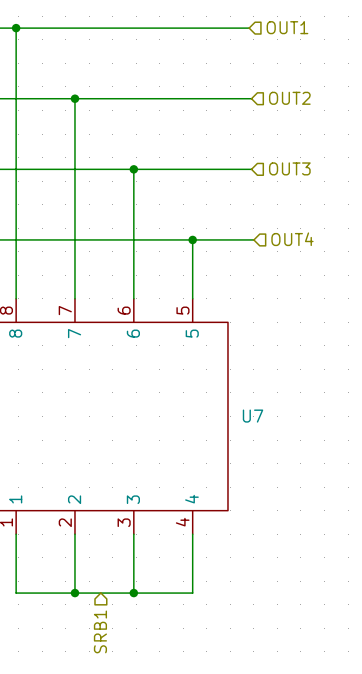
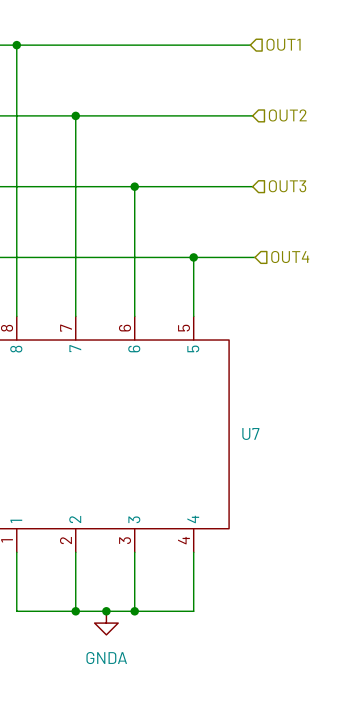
junction: none -> (106, 611)
power symbol: none -> GNDA (106, 623)
hierarchical label: SRB1 (100, 631) -> none

